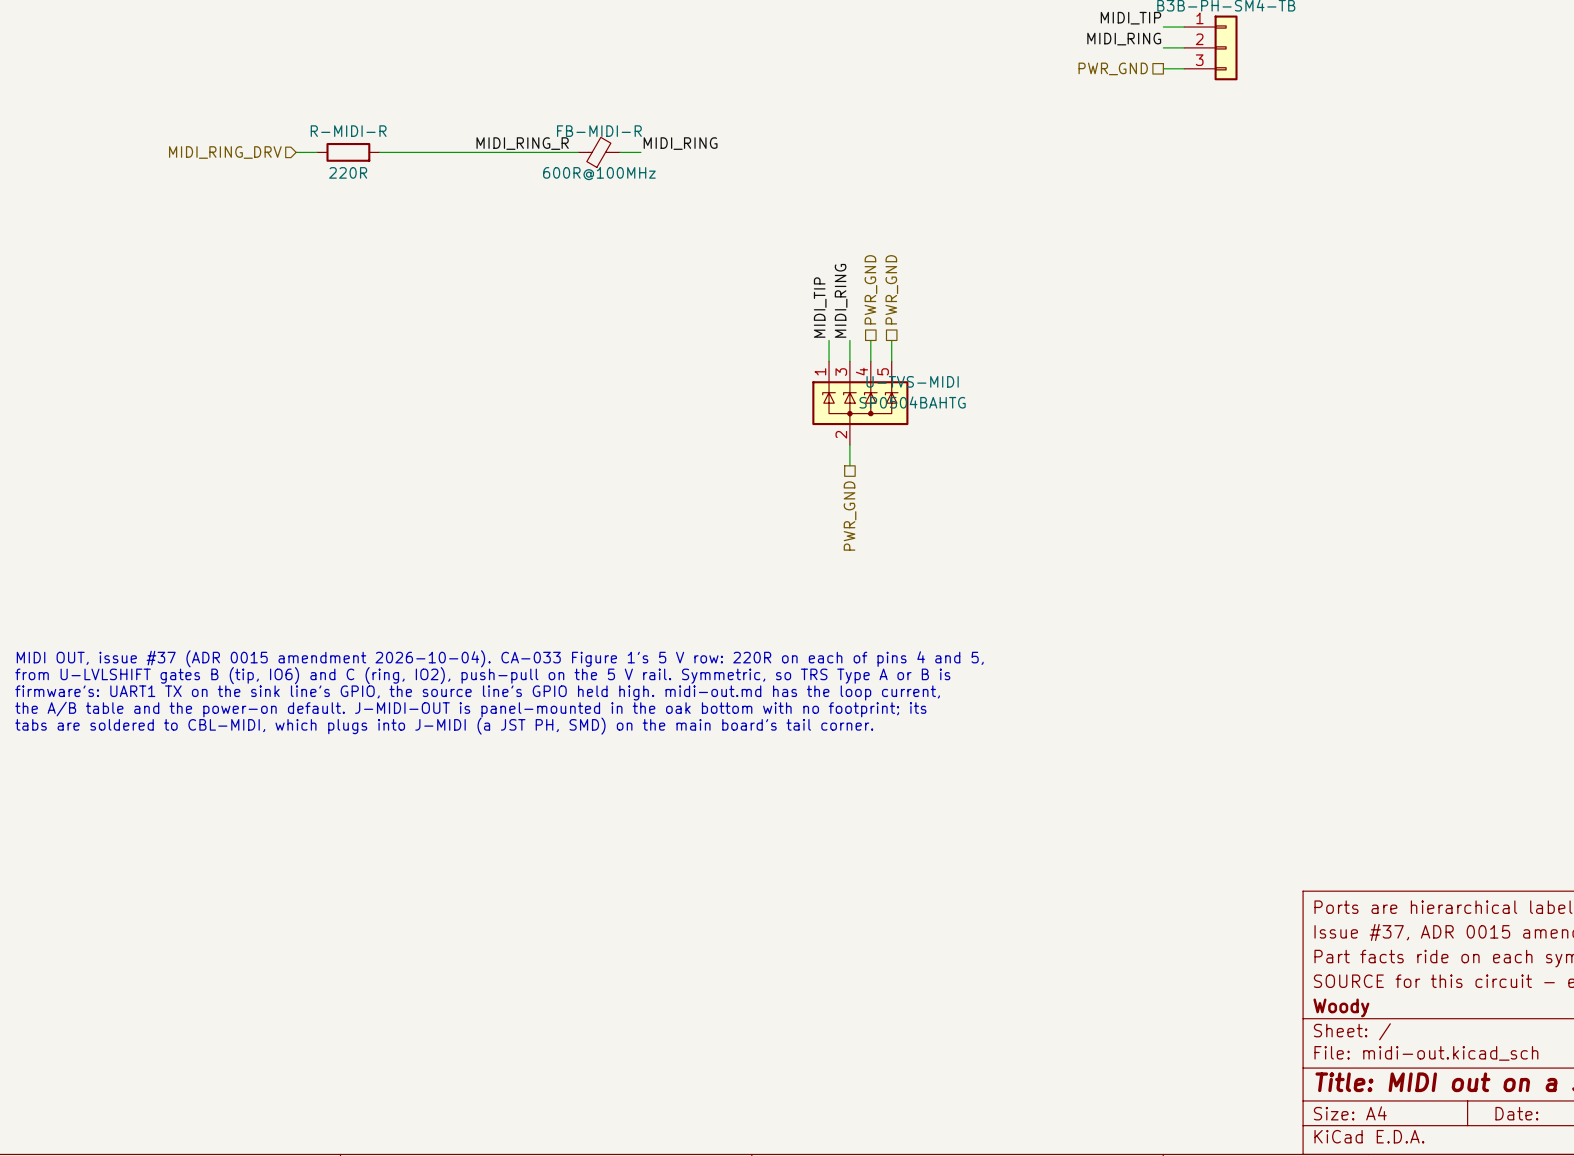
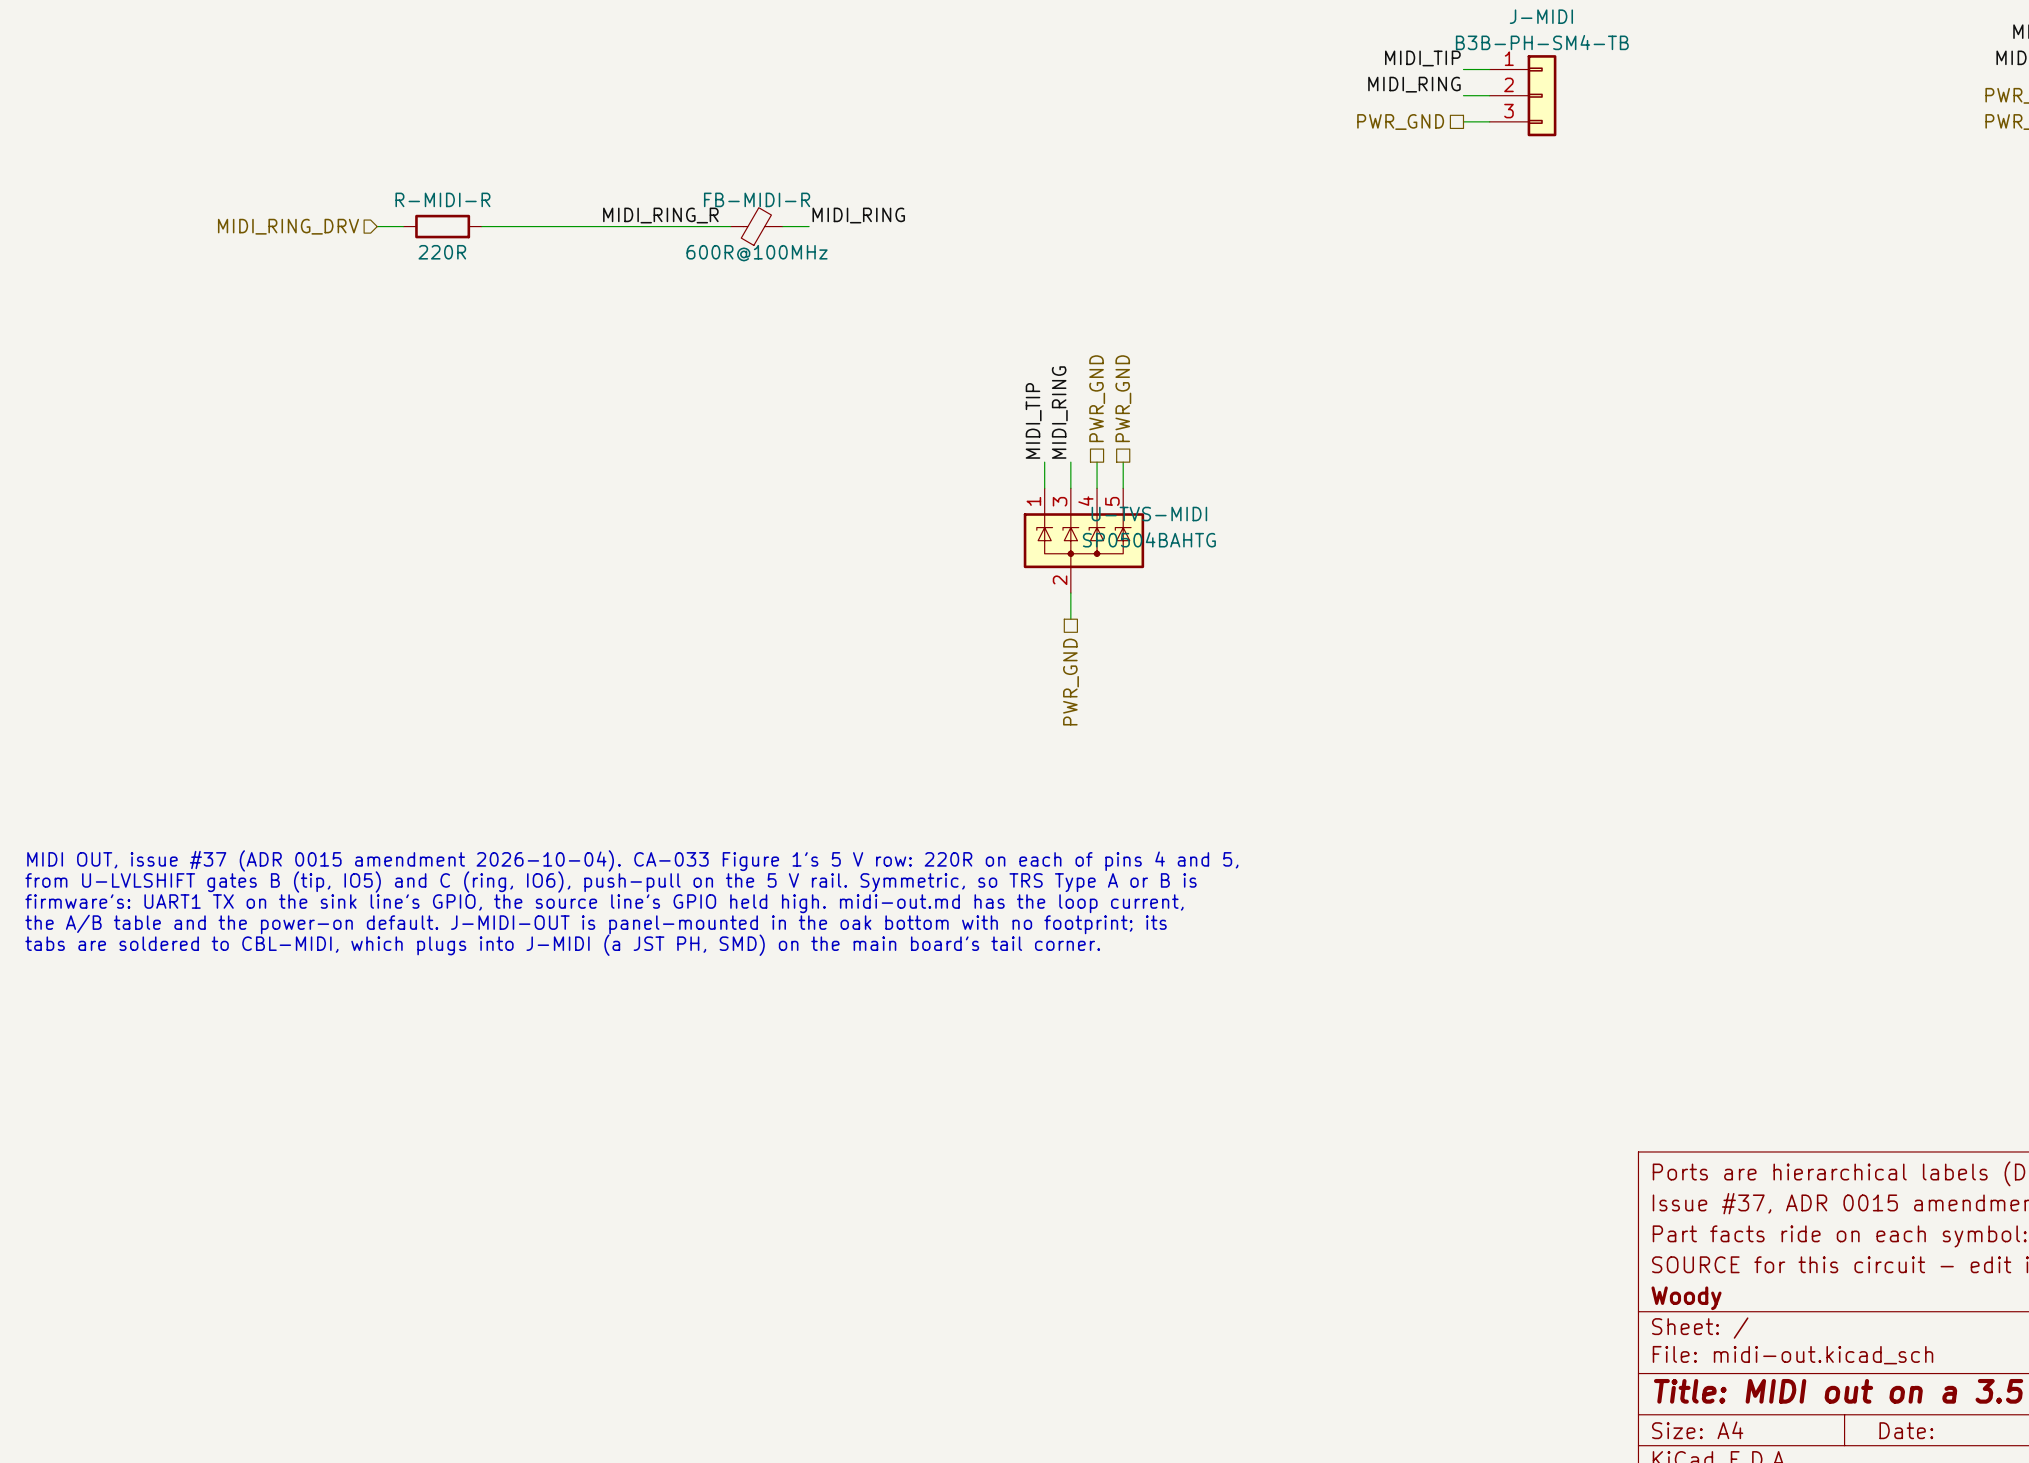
text: from U-LVLSHIFT gates B (tip, IO6) and C (ring, IO2), push-pull on the 5 V rail. Symmetric, so TRS Type A or B is (482, 675) -> from U-LVLSHIFT gates B (tip, IO5) and C (ring, IO6), push-pull on the 5 V rail. Symmetric, so TRS Type A or B is (611, 882)

